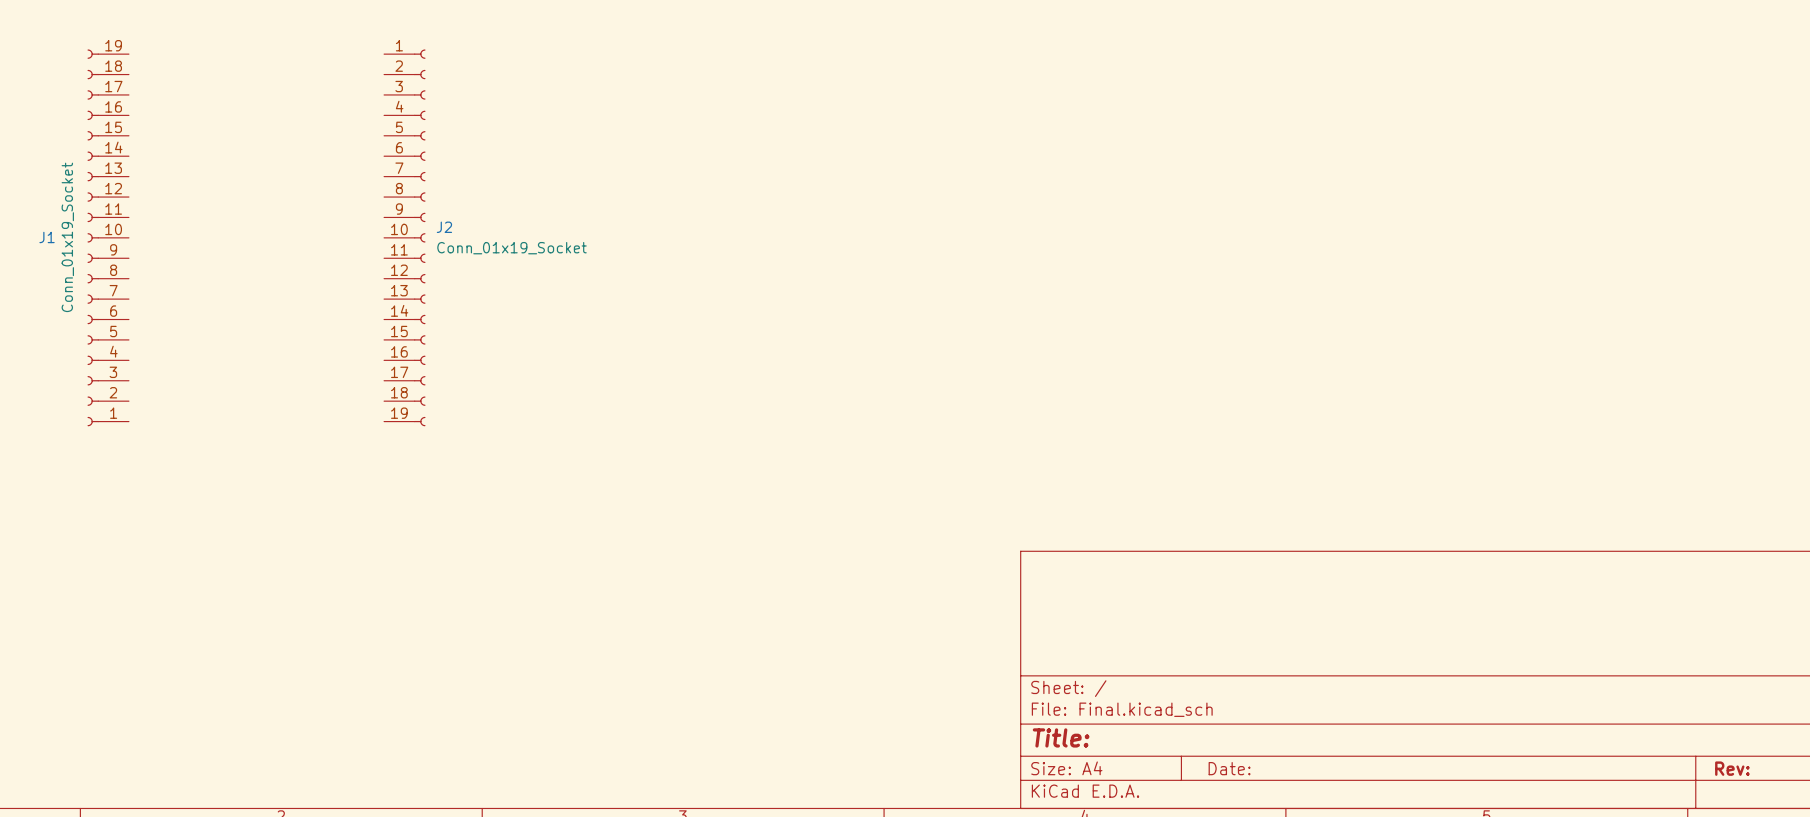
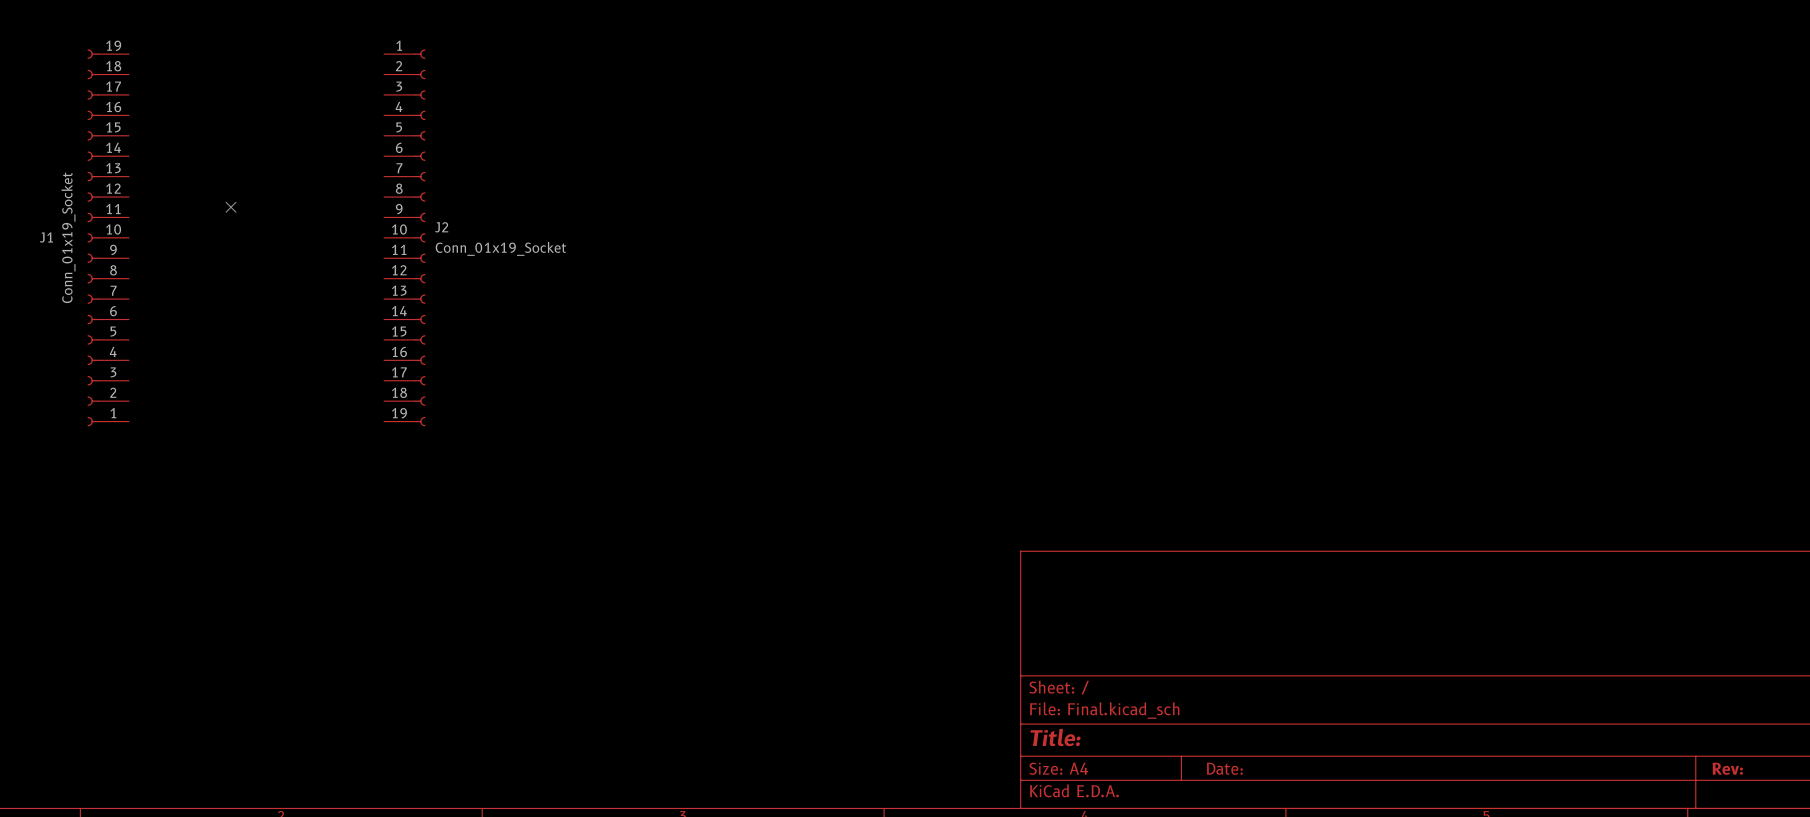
no-connect mark: none -> (230, 207)

